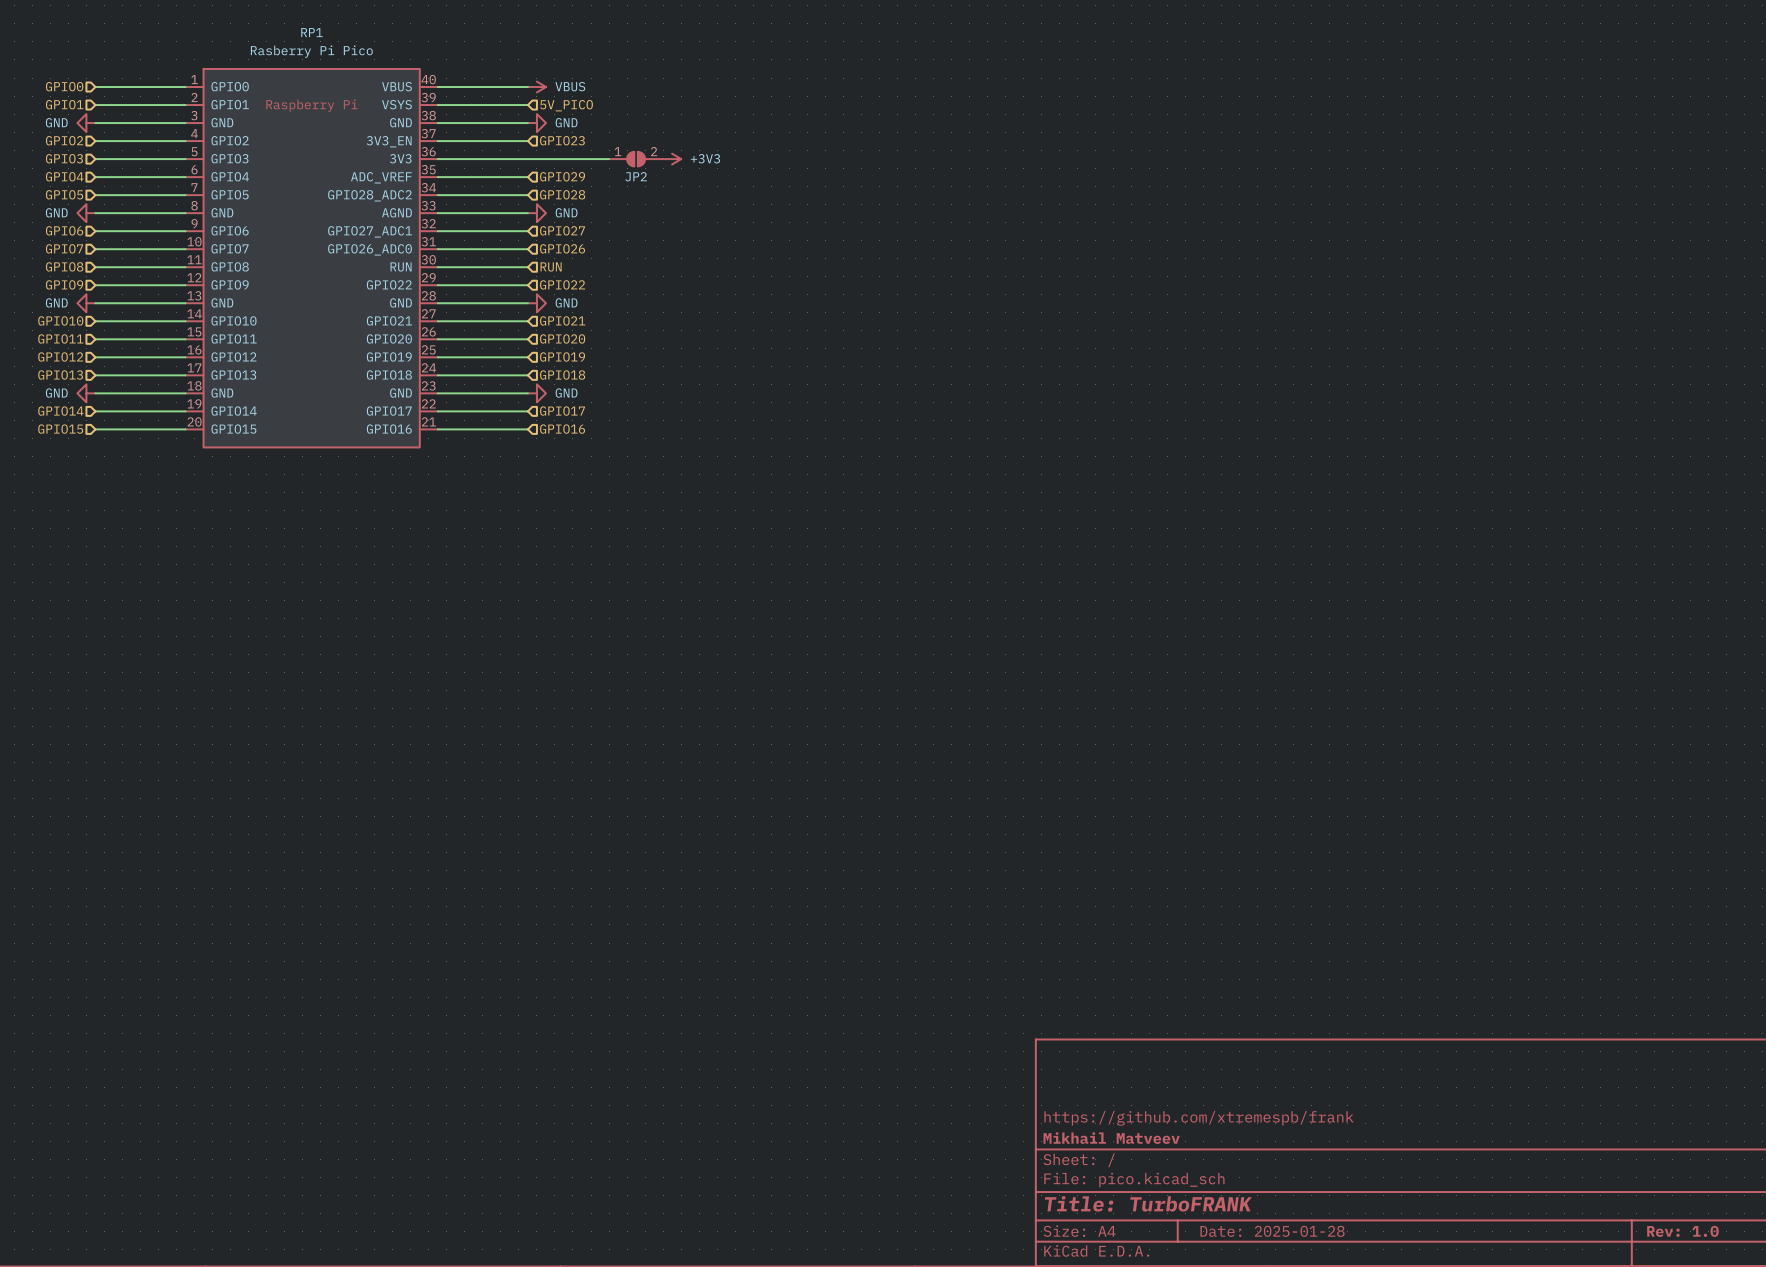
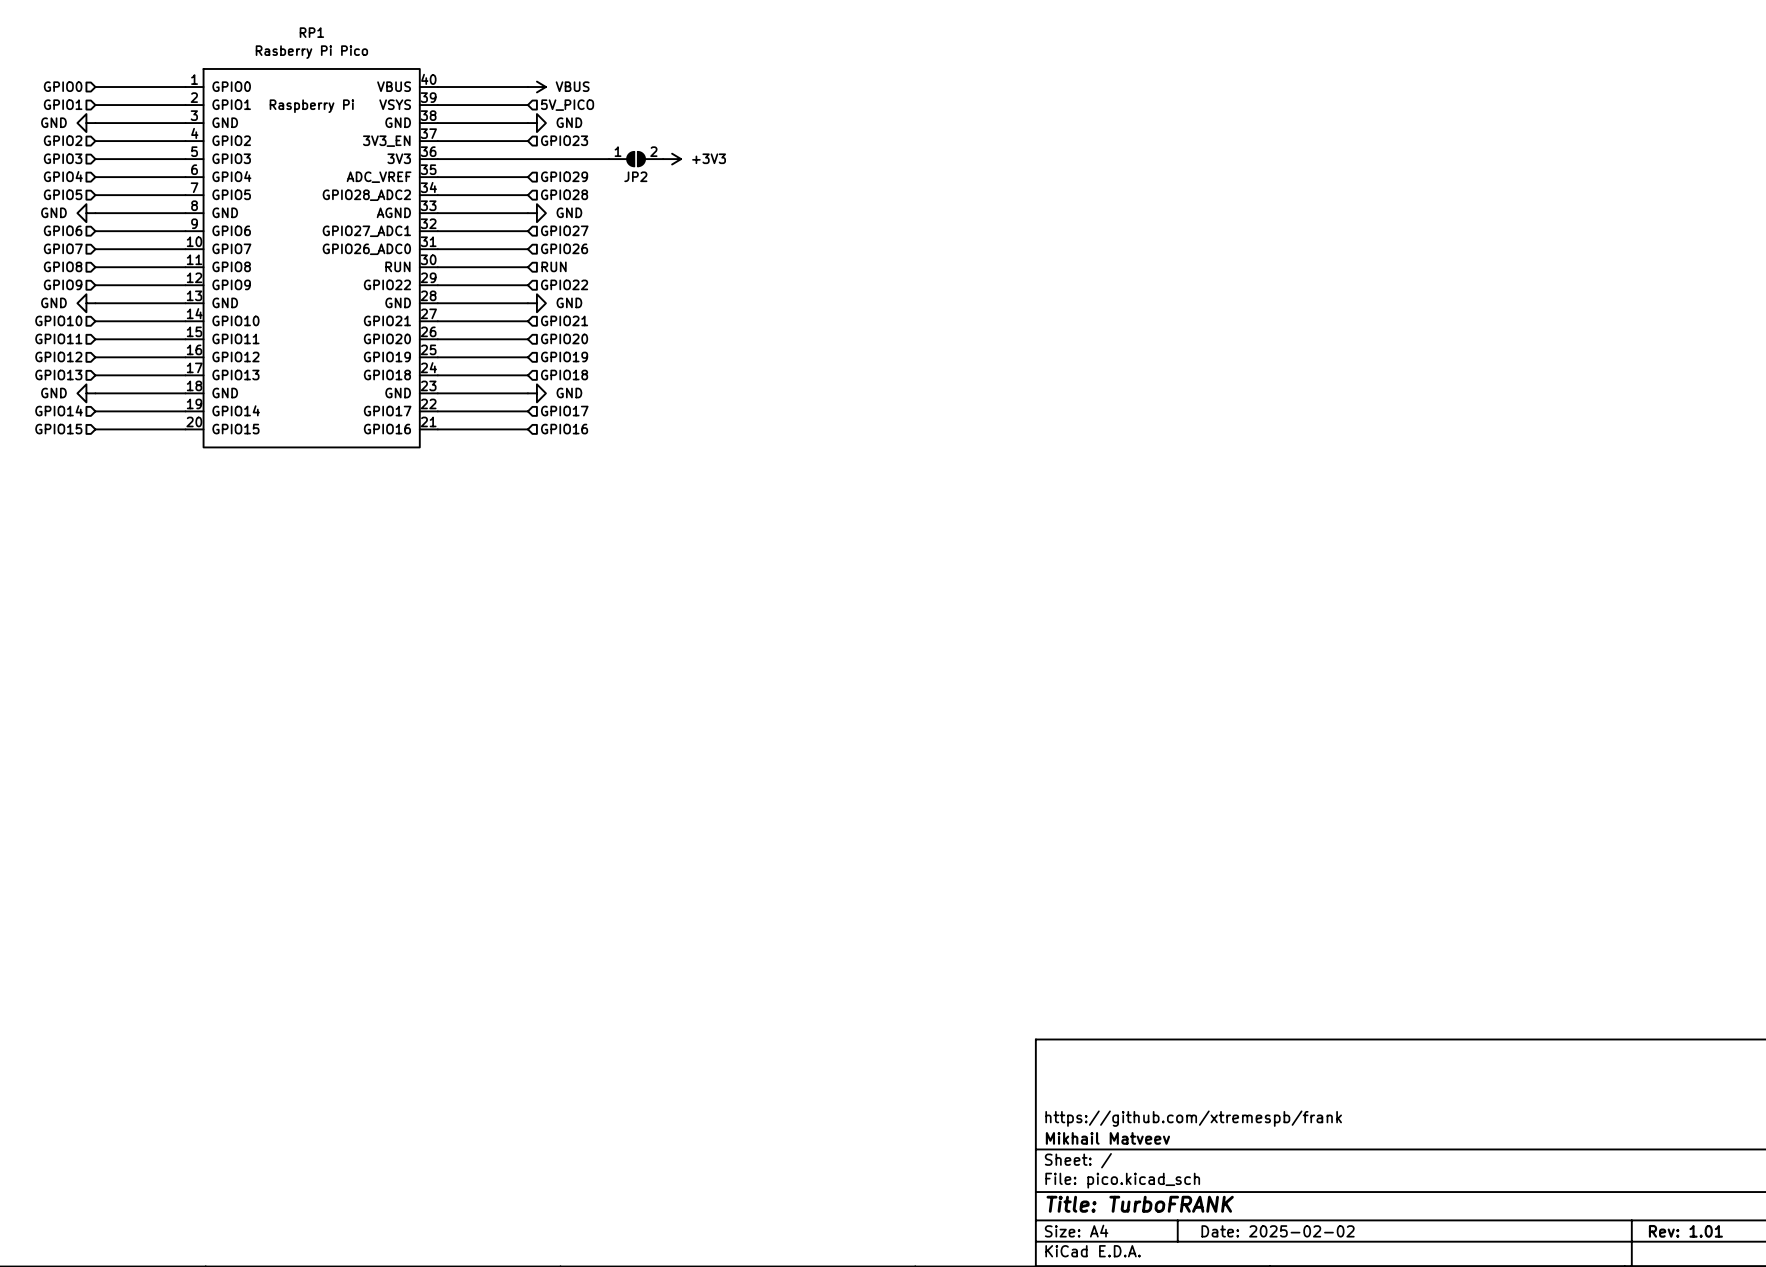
title block: Date: 2025-01-28 (1272, 1231) -> Date: 2025-02-02 (1278, 1231)
title block: Rev: 1.0 (1682, 1231) -> Rev: 1.01 (1685, 1231)

